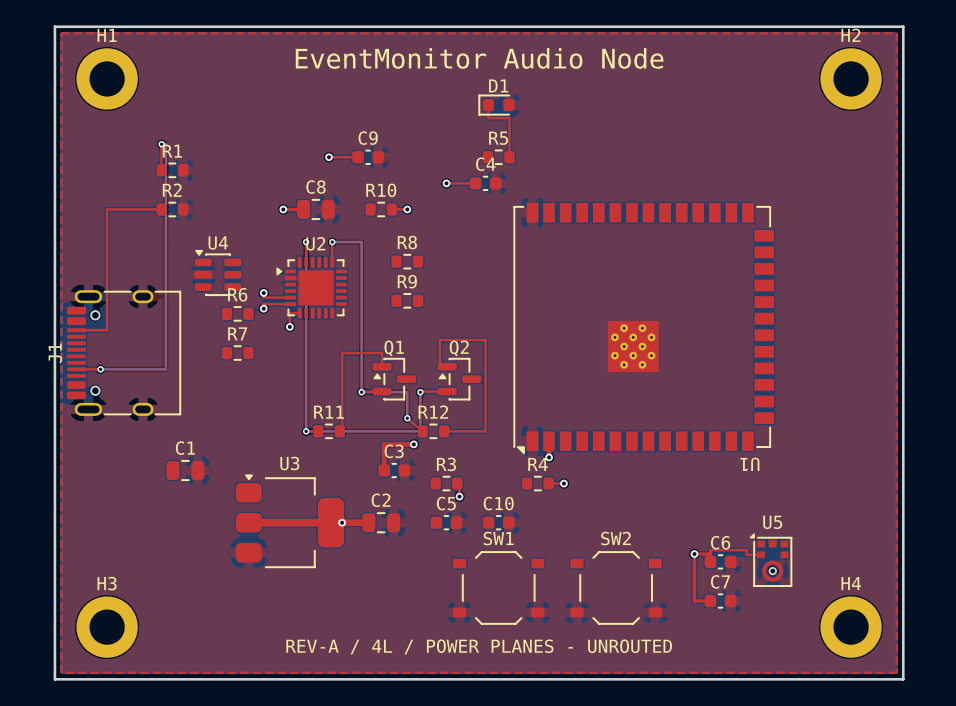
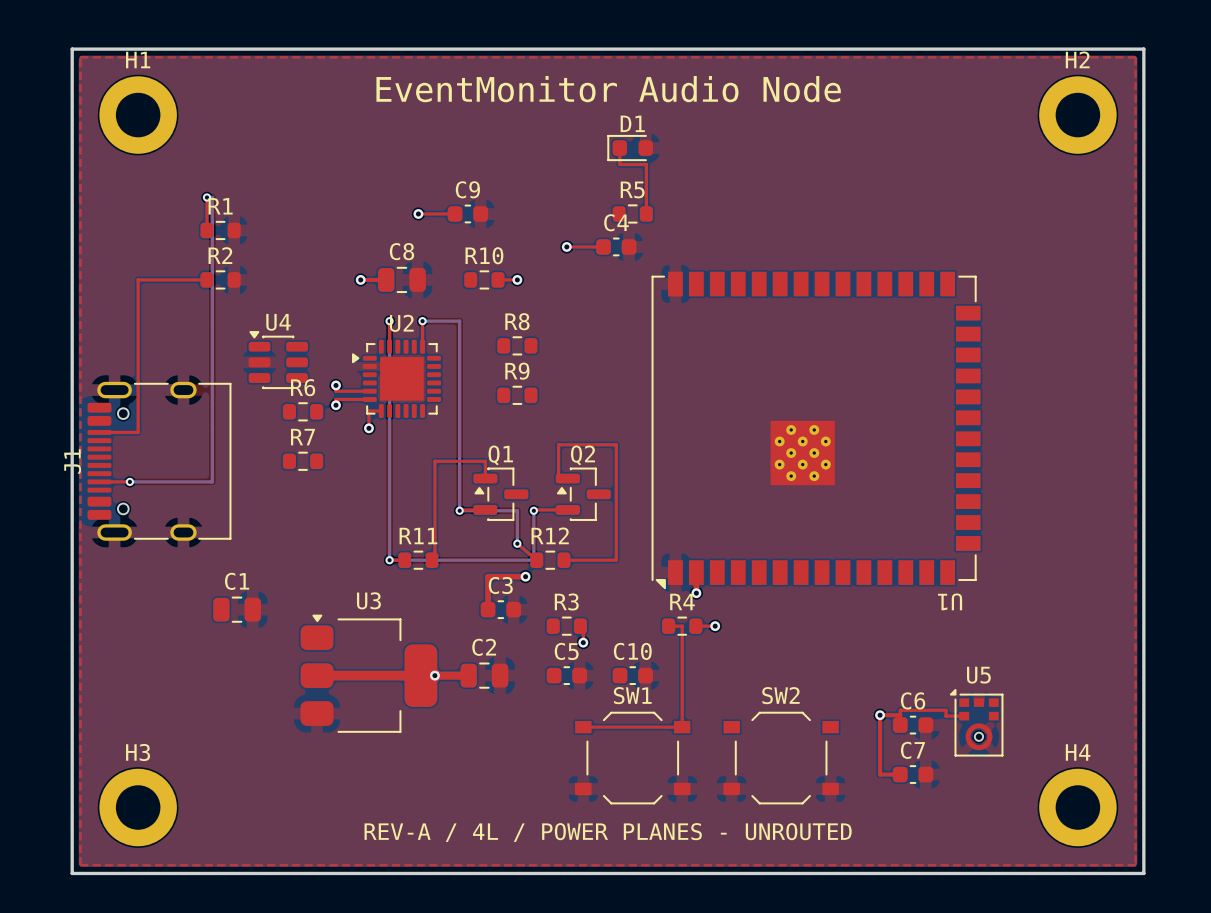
top track: none -> (668, 626) (682, 626) (682, 727) (583, 727)

